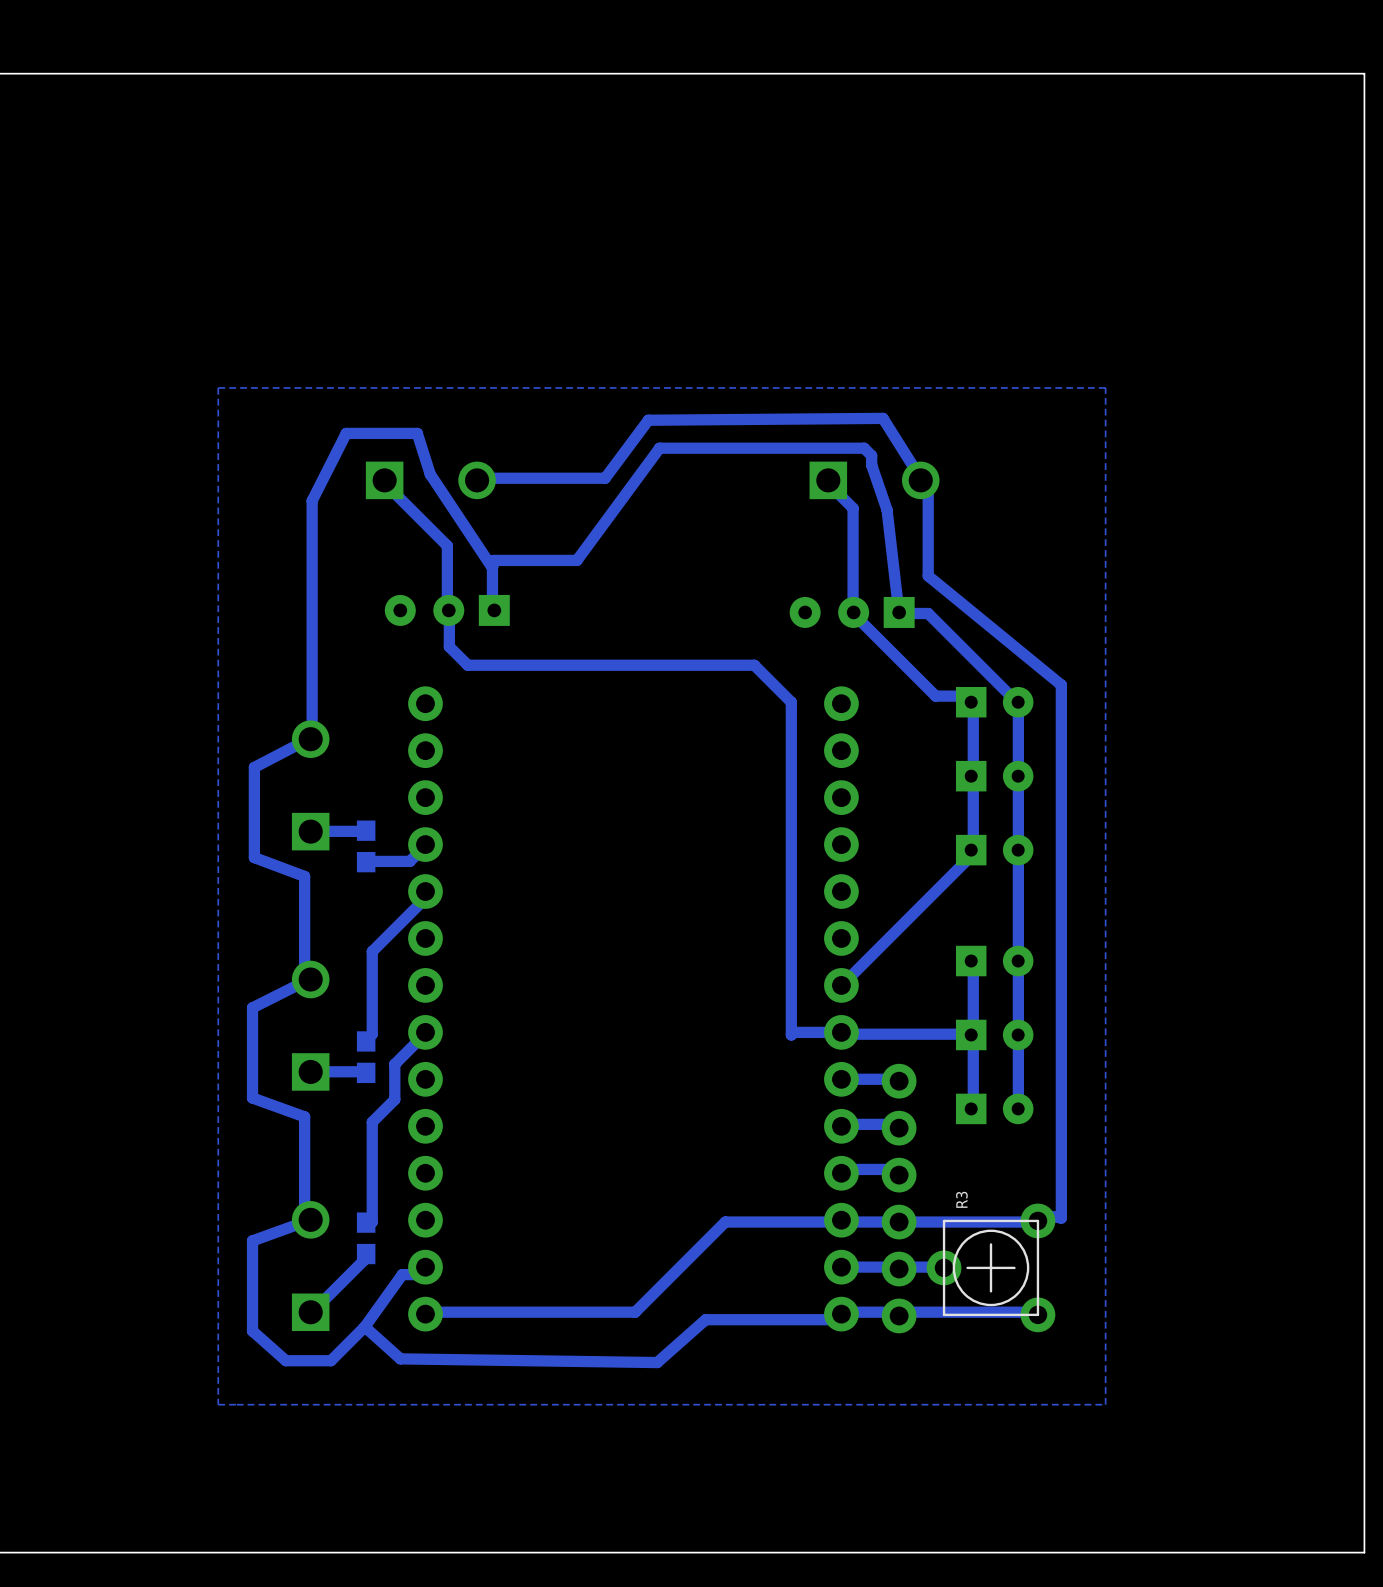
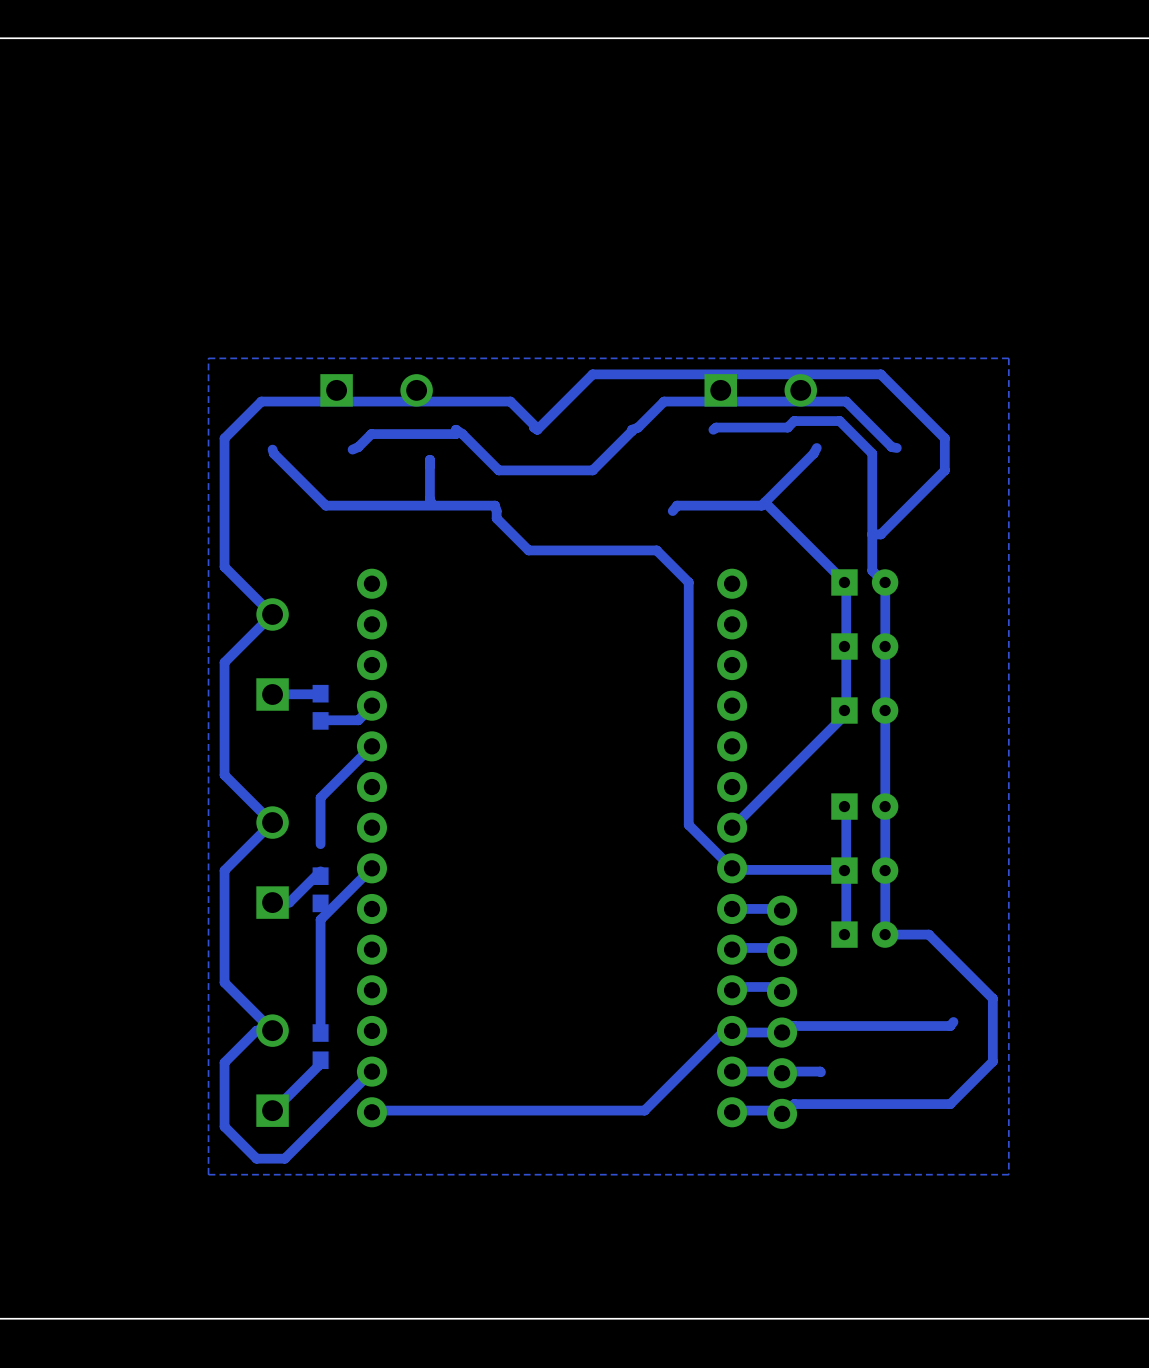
bottom zone outline: (218, 387) (1105, 387) (1105, 1404) (218, 1404) (218, 387) -> (208, 358) (208, 1174) (1008, 1174) (1008, 358) (208, 358)
bottom track: (417, 433) (430, 474) (492, 567) (494, 560) (576, 560) (659, 448) (864, 448) (871, 455) (871, 465) (887, 510) (899, 612) (928, 613) (1003, 688) -> (713, 429) (716, 427) (787, 427) (794, 421) (839, 421) (872, 453) (872, 570)
bottom track: (417, 433) (346, 433) (312, 500) (310, 739) -> none
bottom track: (384, 480) (387, 485) (447, 545) (449, 646) (467, 665) (606, 665) -> (272, 449) (273, 453) (325, 505) (494, 505) (496, 518) (528, 550)
bottom track: (477, 480) (477, 478) (605, 478) (648, 420) (883, 418) (920, 480) (928, 485) (928, 575) (1061, 685) (1061, 1218) (1040, 1214) (1037, 1220) (1033, 1222) (905, 1222) -> (953, 1021) (950, 1026) (794, 1026) (787, 1032)
bottom track: (828, 480) (830, 485) (853, 508) (853, 612) (860, 613) (860, 621) (935, 696) (965, 696) -> (764, 502) (839, 577)
bottom track: none -> (816, 448) (813, 453) (761, 505) (677, 505) (672, 511)
bottom track: none -> (896, 448) (891, 447) (846, 401) (664, 401) (638, 427) (632, 429) (592, 470) (498, 470) (456, 429) (455, 434) (371, 434) (358, 447) (352, 449)
part: (447, 610) -> none
part: (852, 612) -> none
bottom track: (304, 741) (254, 767) (254, 857) (304, 876) (304, 974) -> (872, 534) (880, 534) (944, 470) (944, 438) (880, 374) (592, 374) (537, 429) (510, 401) (261, 401) (224, 438) (224, 566) (272, 614) (224, 662) (224, 775) (267, 817)
bottom track: (425, 891) (424, 898) (372, 951) (372, 1034) (366, 1041) -> (371, 746) (320, 797) (320, 844)
bottom track: (310, 979) (252, 1007) (252, 1098) (304, 1116) (304, 1214) (310, 1219) (252, 1240) (252, 1331) (285, 1360) (330, 1360) (364, 1326) -> (272, 822) (224, 870) (224, 982) (272, 1030) (256, 1030) (224, 1062) (224, 1126) (256, 1158) (284, 1158) (371, 1071)
bottom track: (791, 982) (791, 1034) (793, 1032) (841, 1032) -> (688, 824) (732, 868)
bottom track: (425, 1032) (394, 1064) (394, 1099) (372, 1122) (372, 1222) (366, 1222) -> (371, 868) (320, 919) (320, 1033)
bottom track: (310, 1071) (366, 1072) -> (272, 902) (289, 902) (320, 871)
bottom track: (841, 1220) (838, 1222) (725, 1222) (635, 1312) -> (732, 1030) (729, 1026) (644, 1110) (553, 1110)
bottom track: (425, 1267) (424, 1274) (402, 1274) (364, 1326) -> none
R3: (991, 1267) -> none
bottom track: (905, 1312) (1033, 1312) (1037, 1314) -> (787, 1110) (794, 1104) (950, 1104) (992, 1061) (992, 998) (928, 934) (885, 934)
bottom track: (841, 1314) (838, 1319) (705, 1319) (657, 1362) (400, 1358) (364, 1326) -> none

